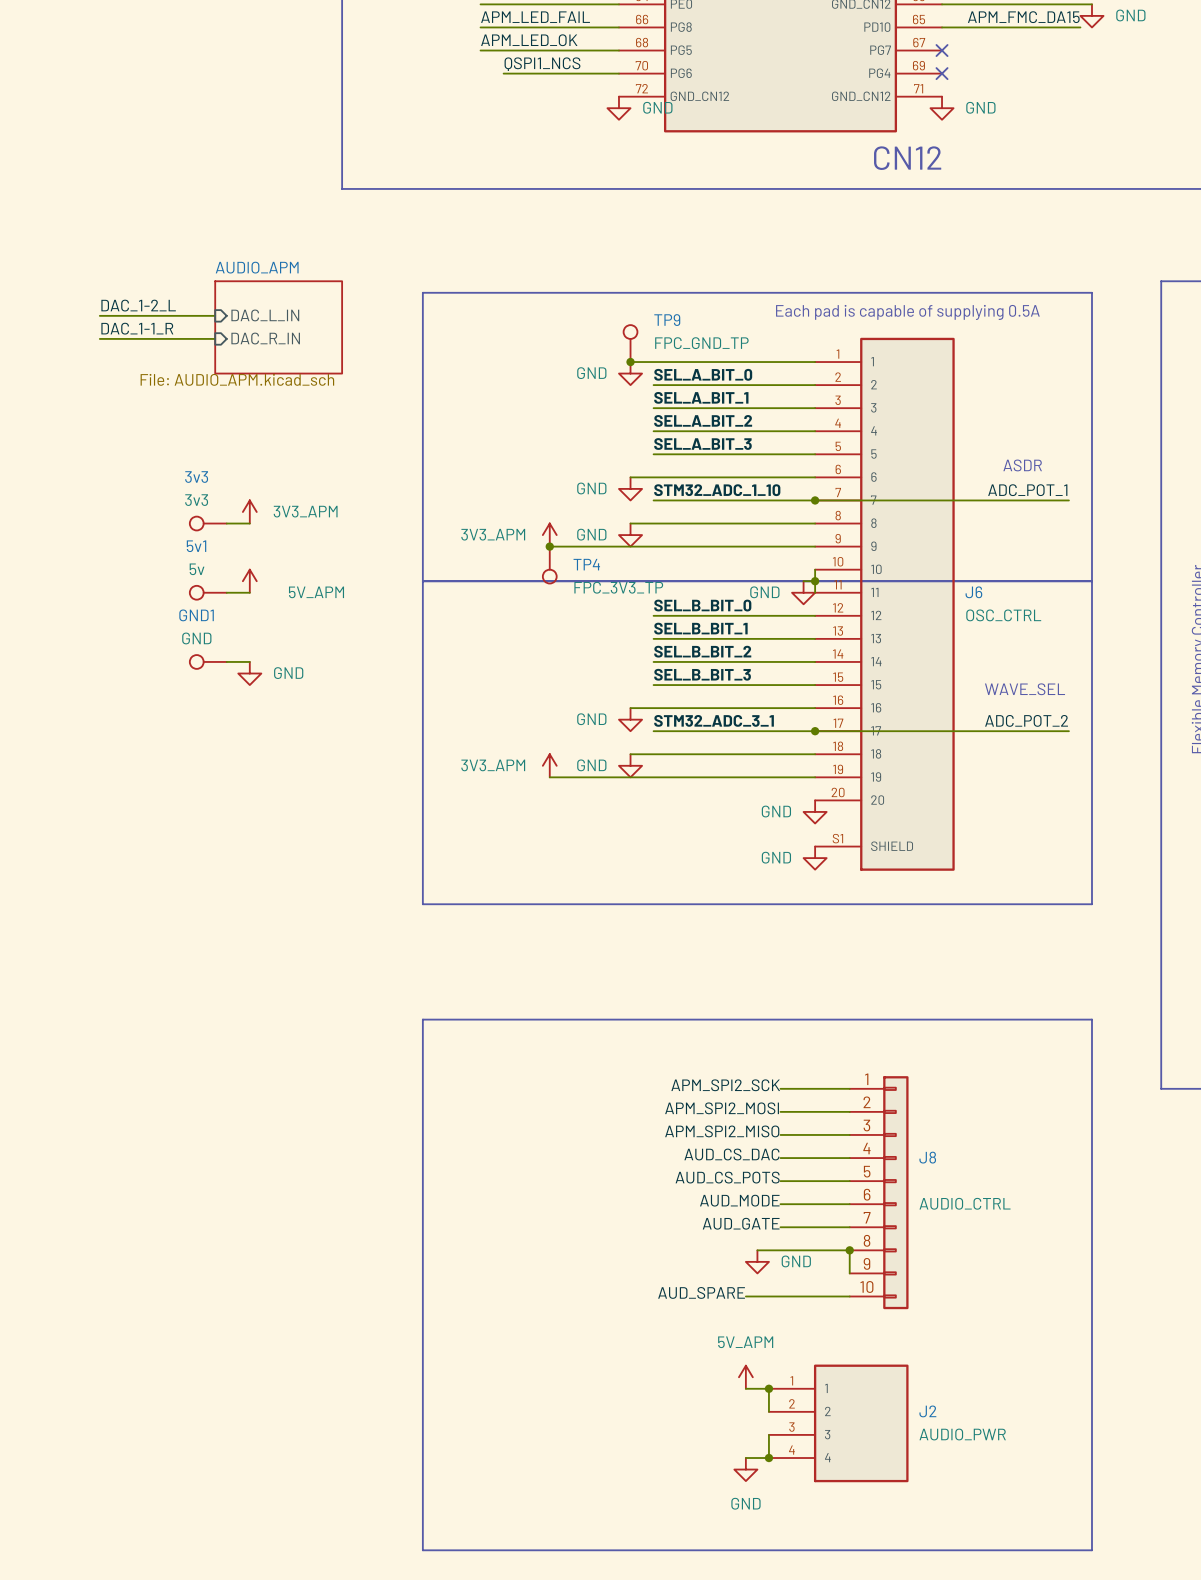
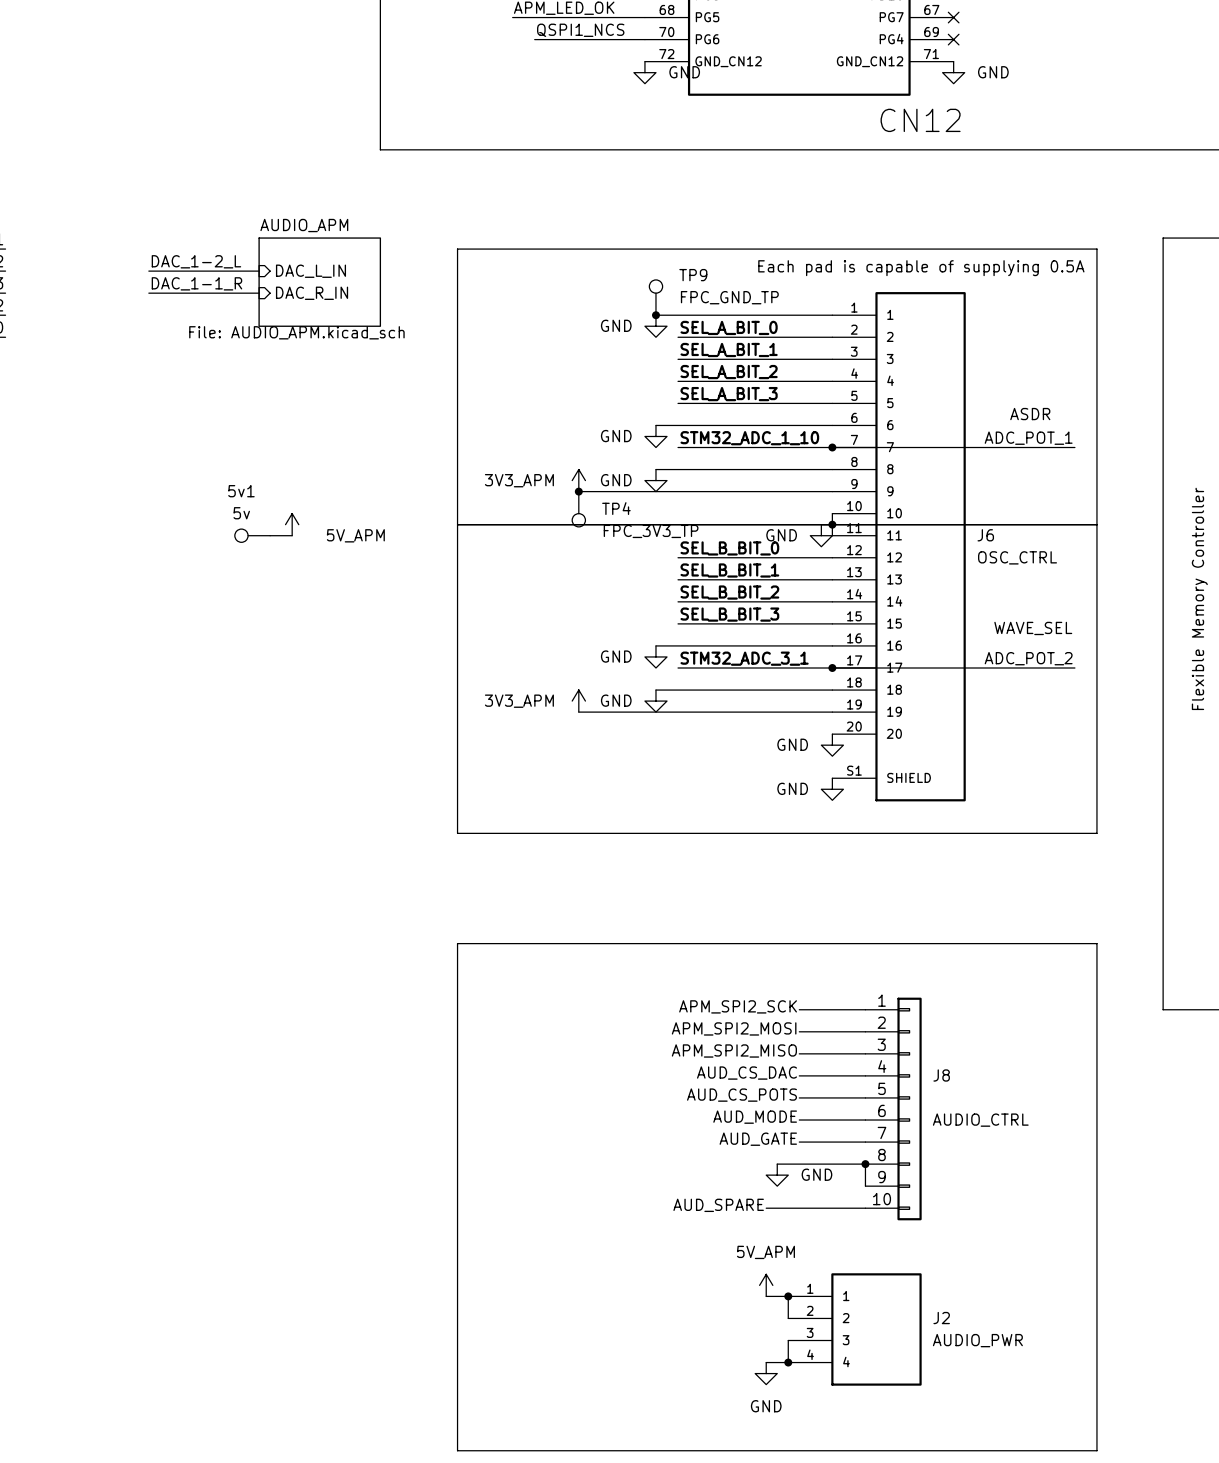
power symbol: 3V3_APM (249, 511) -> none
3v3: 3v3 (208, 523) -> none
wire: (226, 523) (249, 523) -> none
GND1: GND (208, 661) -> none
wire: (226, 661) (249, 661) -> none
power symbol: GND (249, 673) -> none

